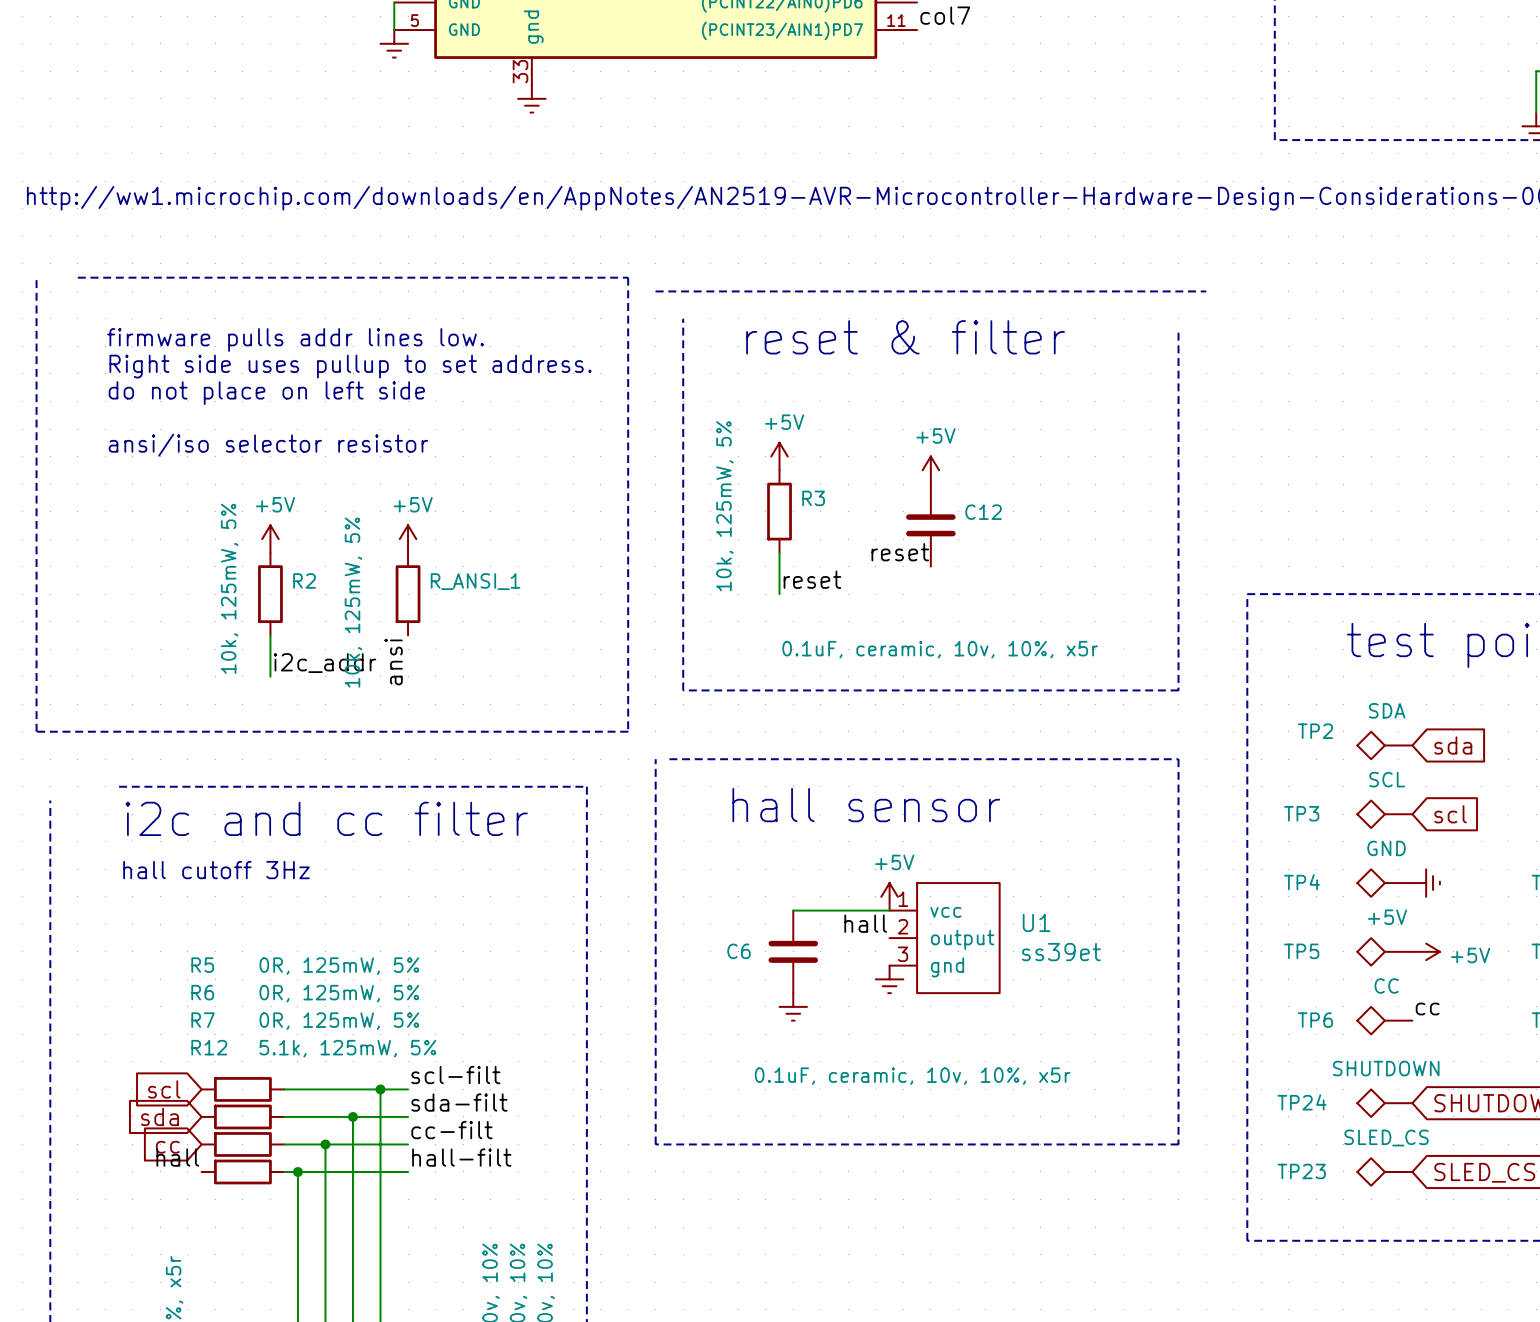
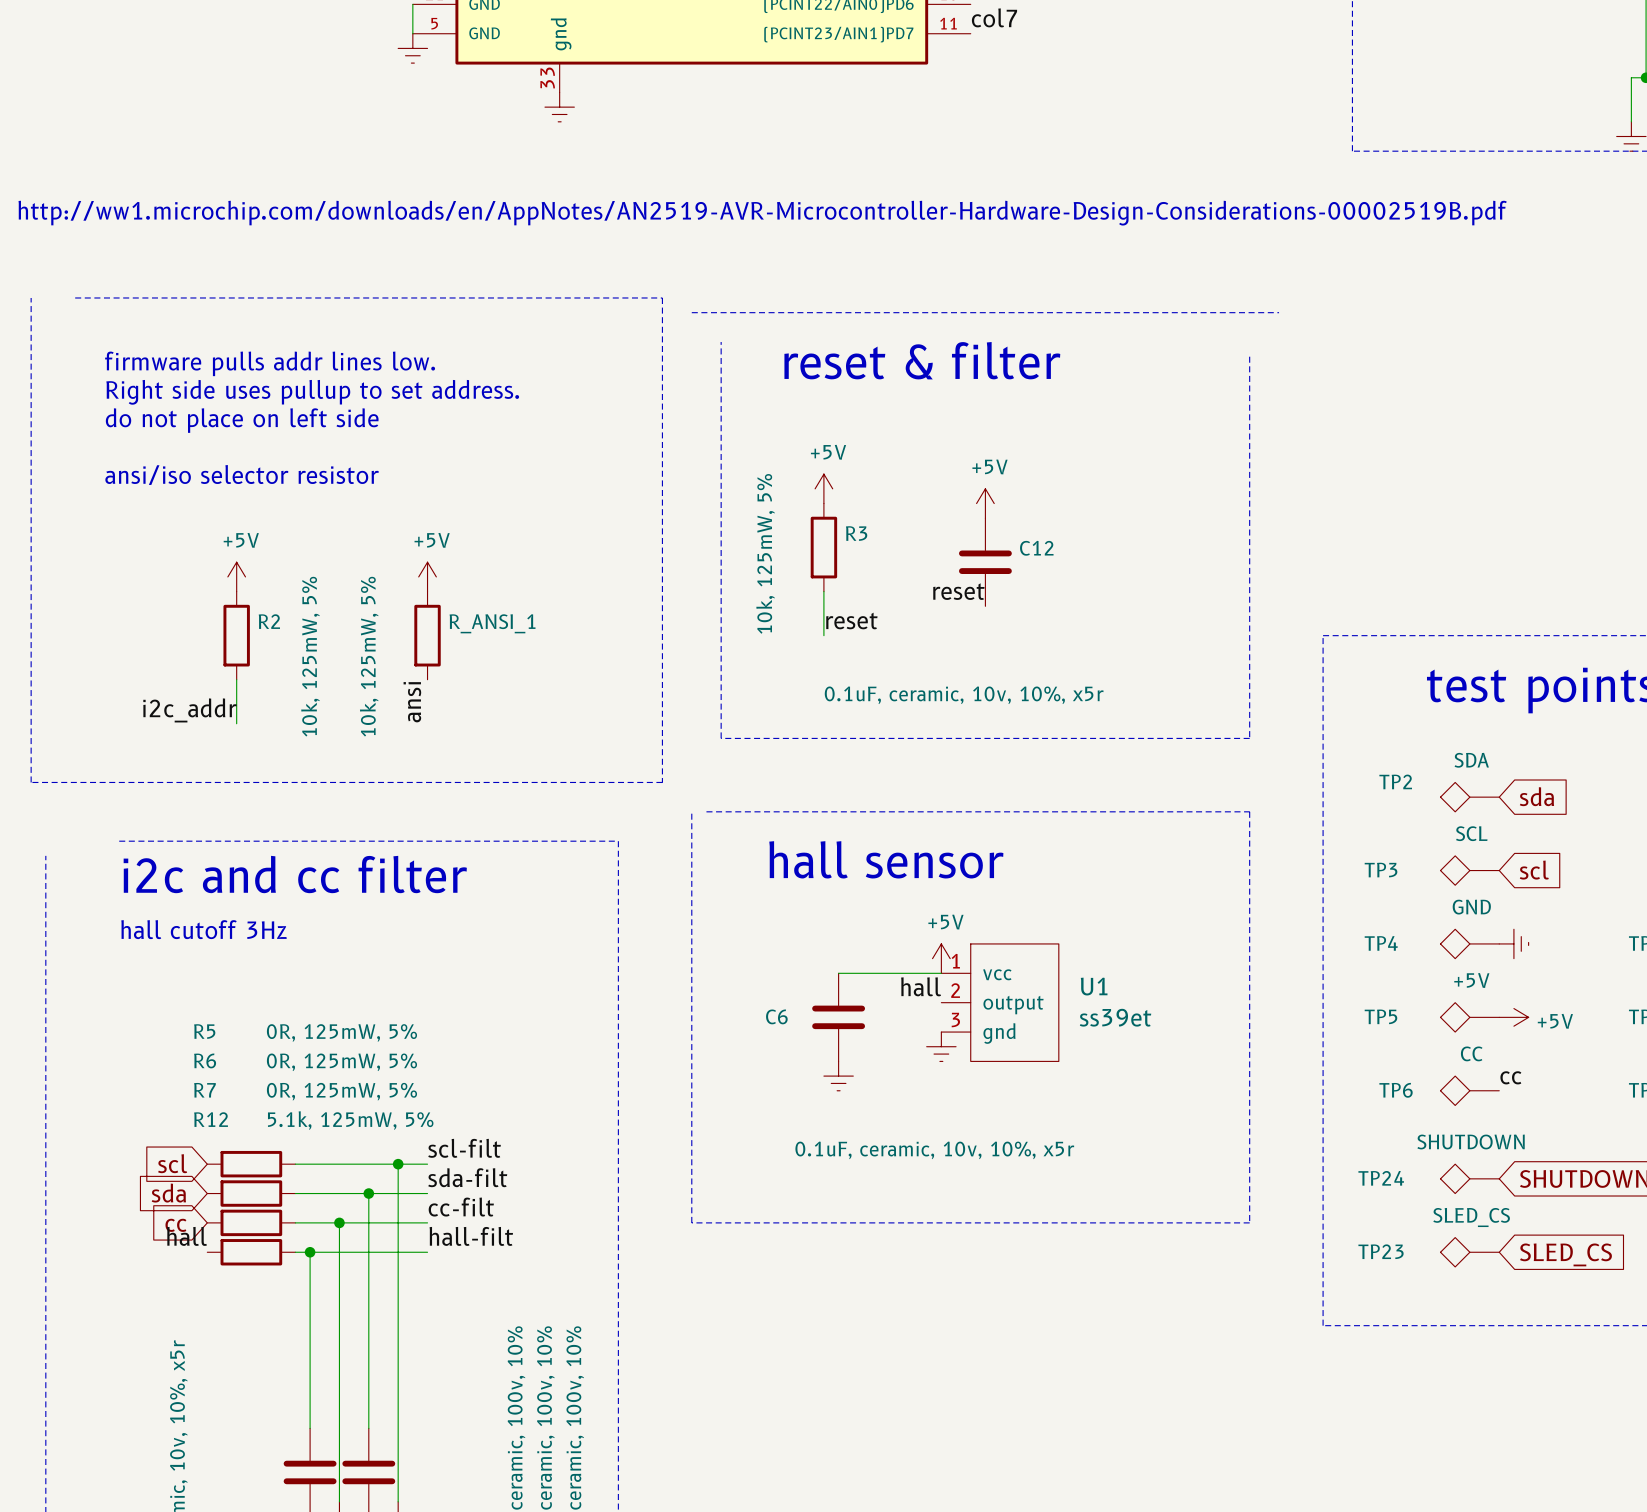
power symbol position: +5V (270, 539) -> +5V (236, 576)
R2 value position: 10k, 125mW, 5% (229, 588) -> 10k, 125mW, 5% (310, 656)
R2 position: (270, 594) -> (236, 635)
wire: (270, 635) (270, 676) -> (236, 679) (236, 723)
label position: i2c_addr (324, 663) -> i2c_addr (189, 710)

